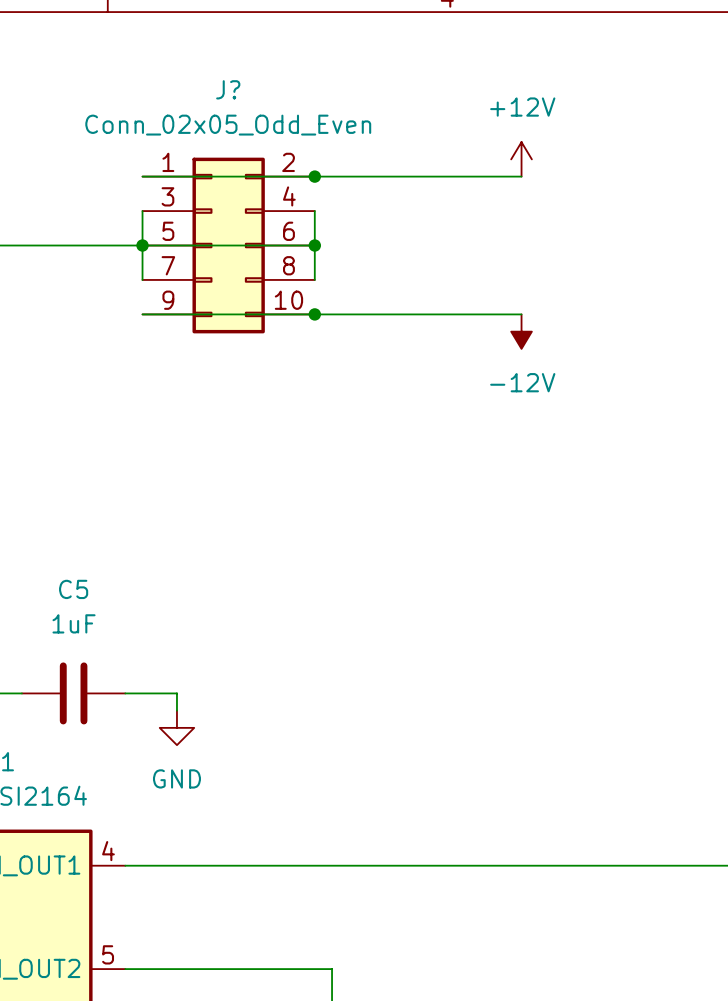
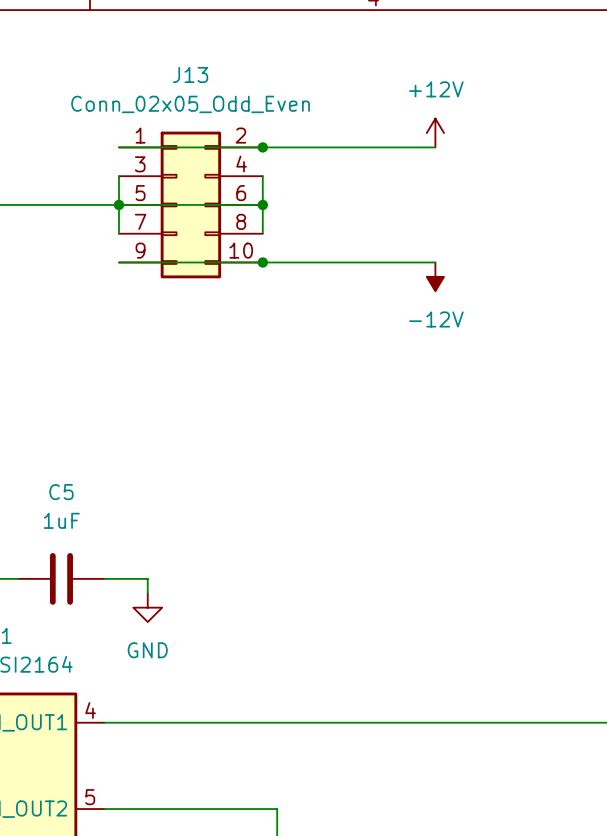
J? name: J? (228, 89) -> J13 (190, 74)

